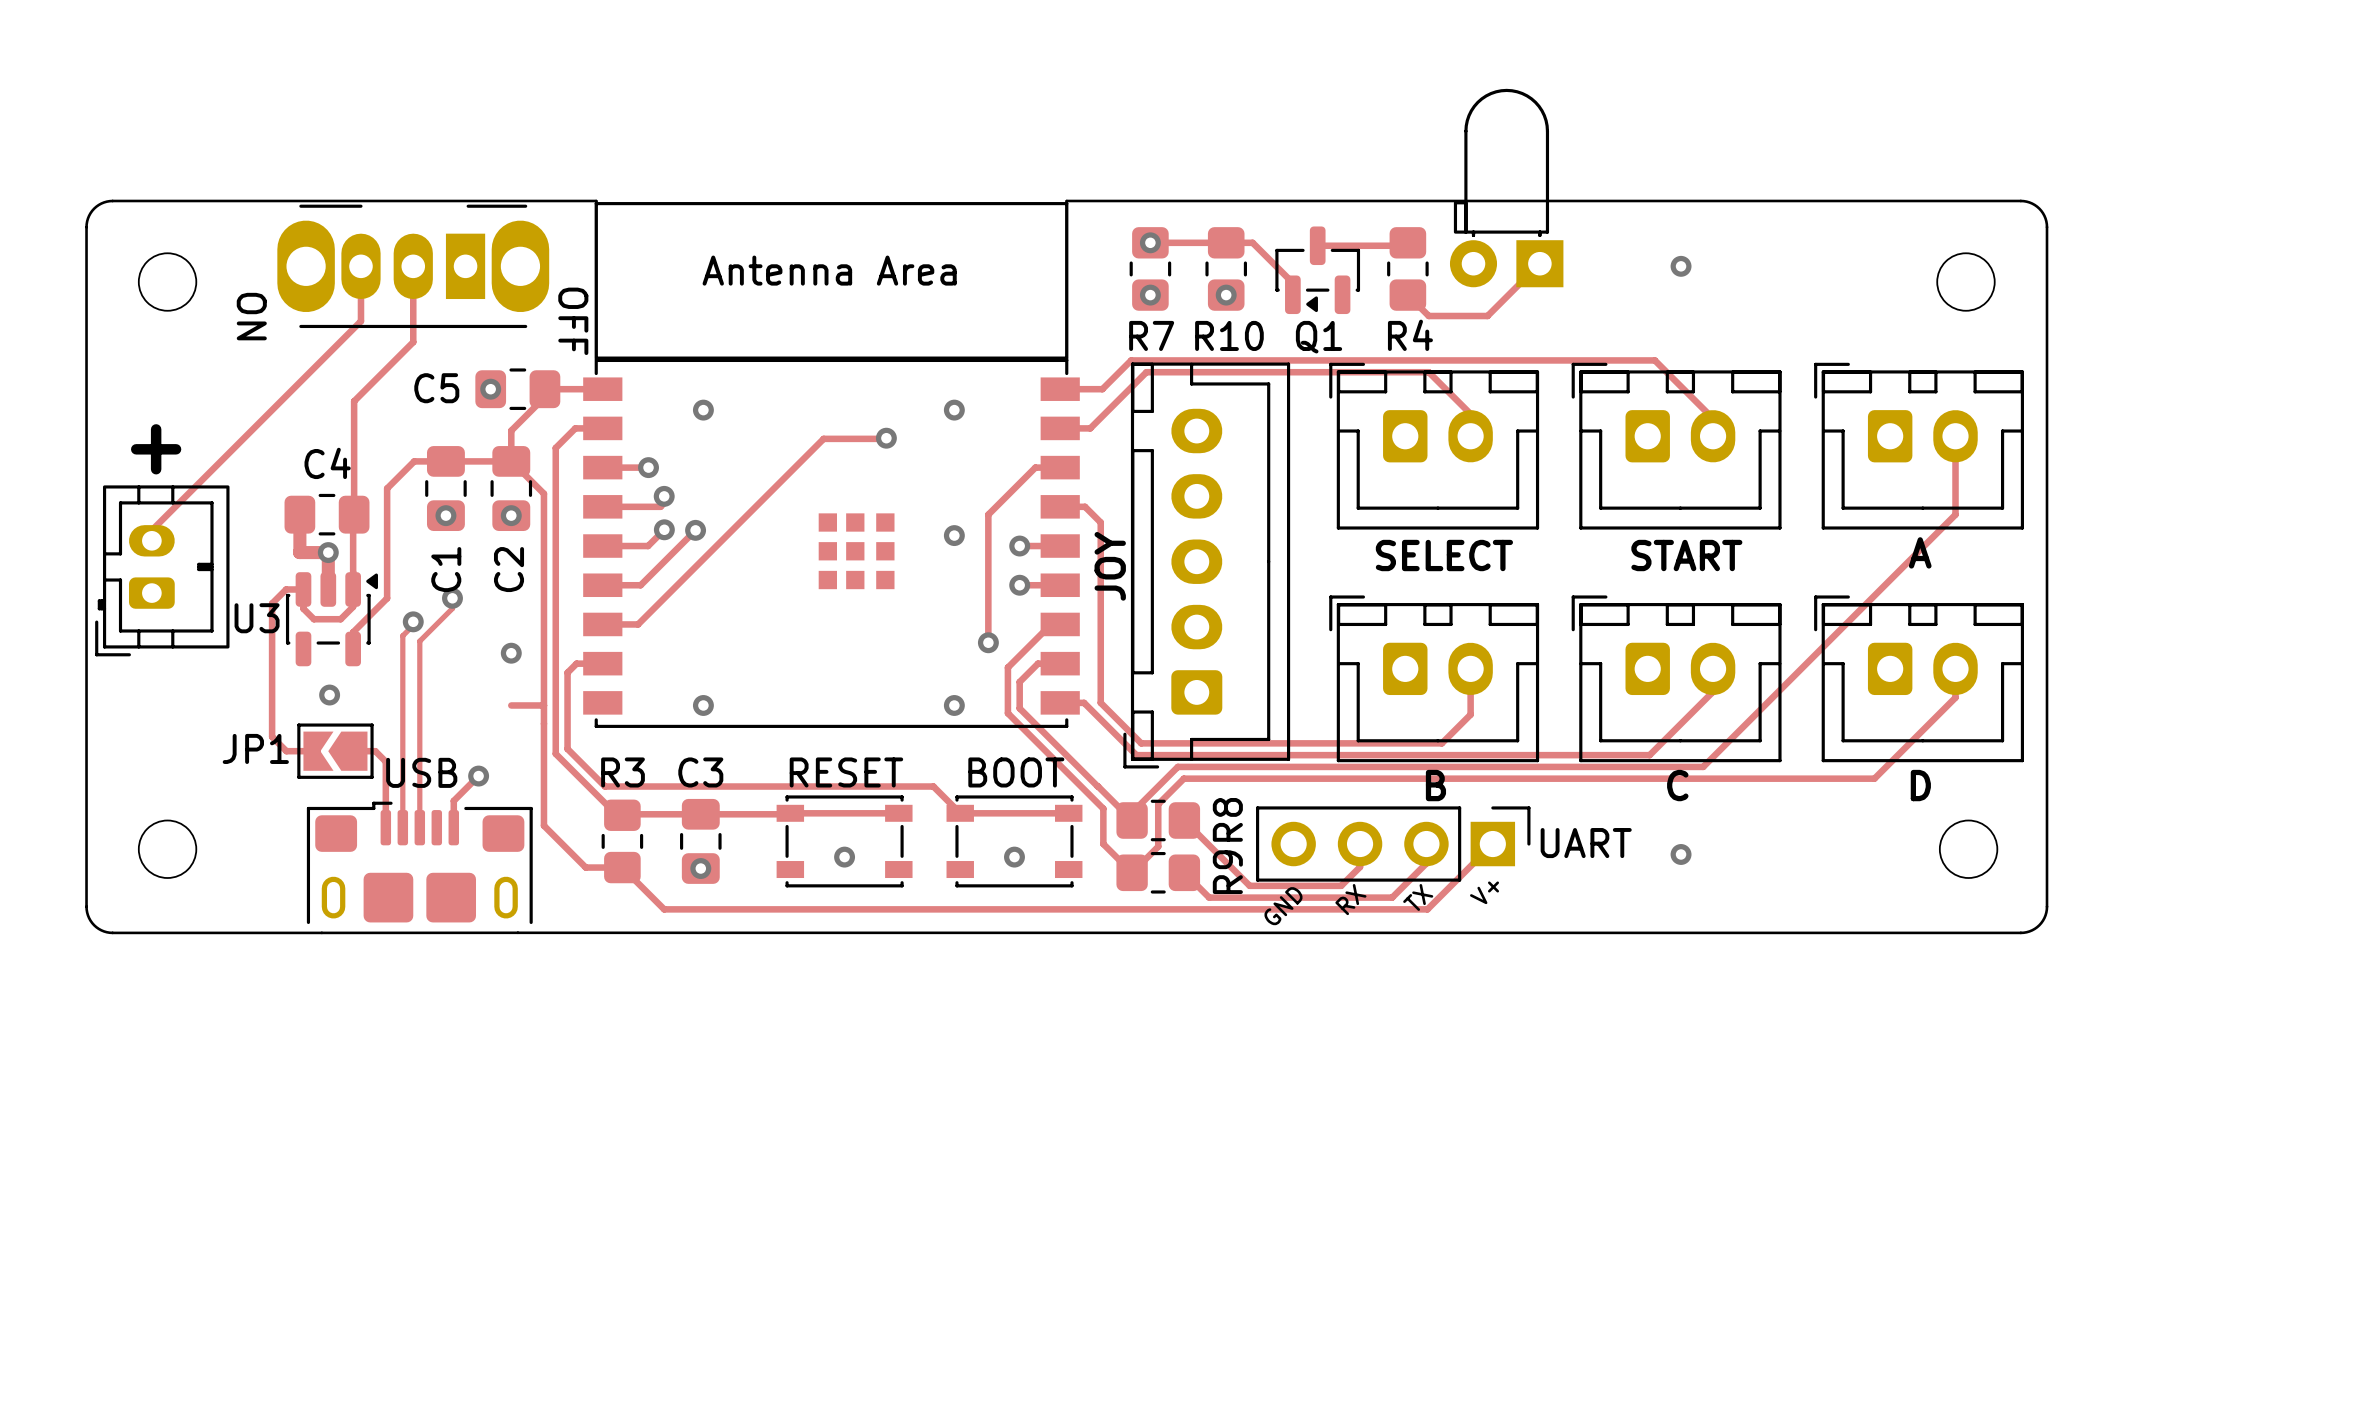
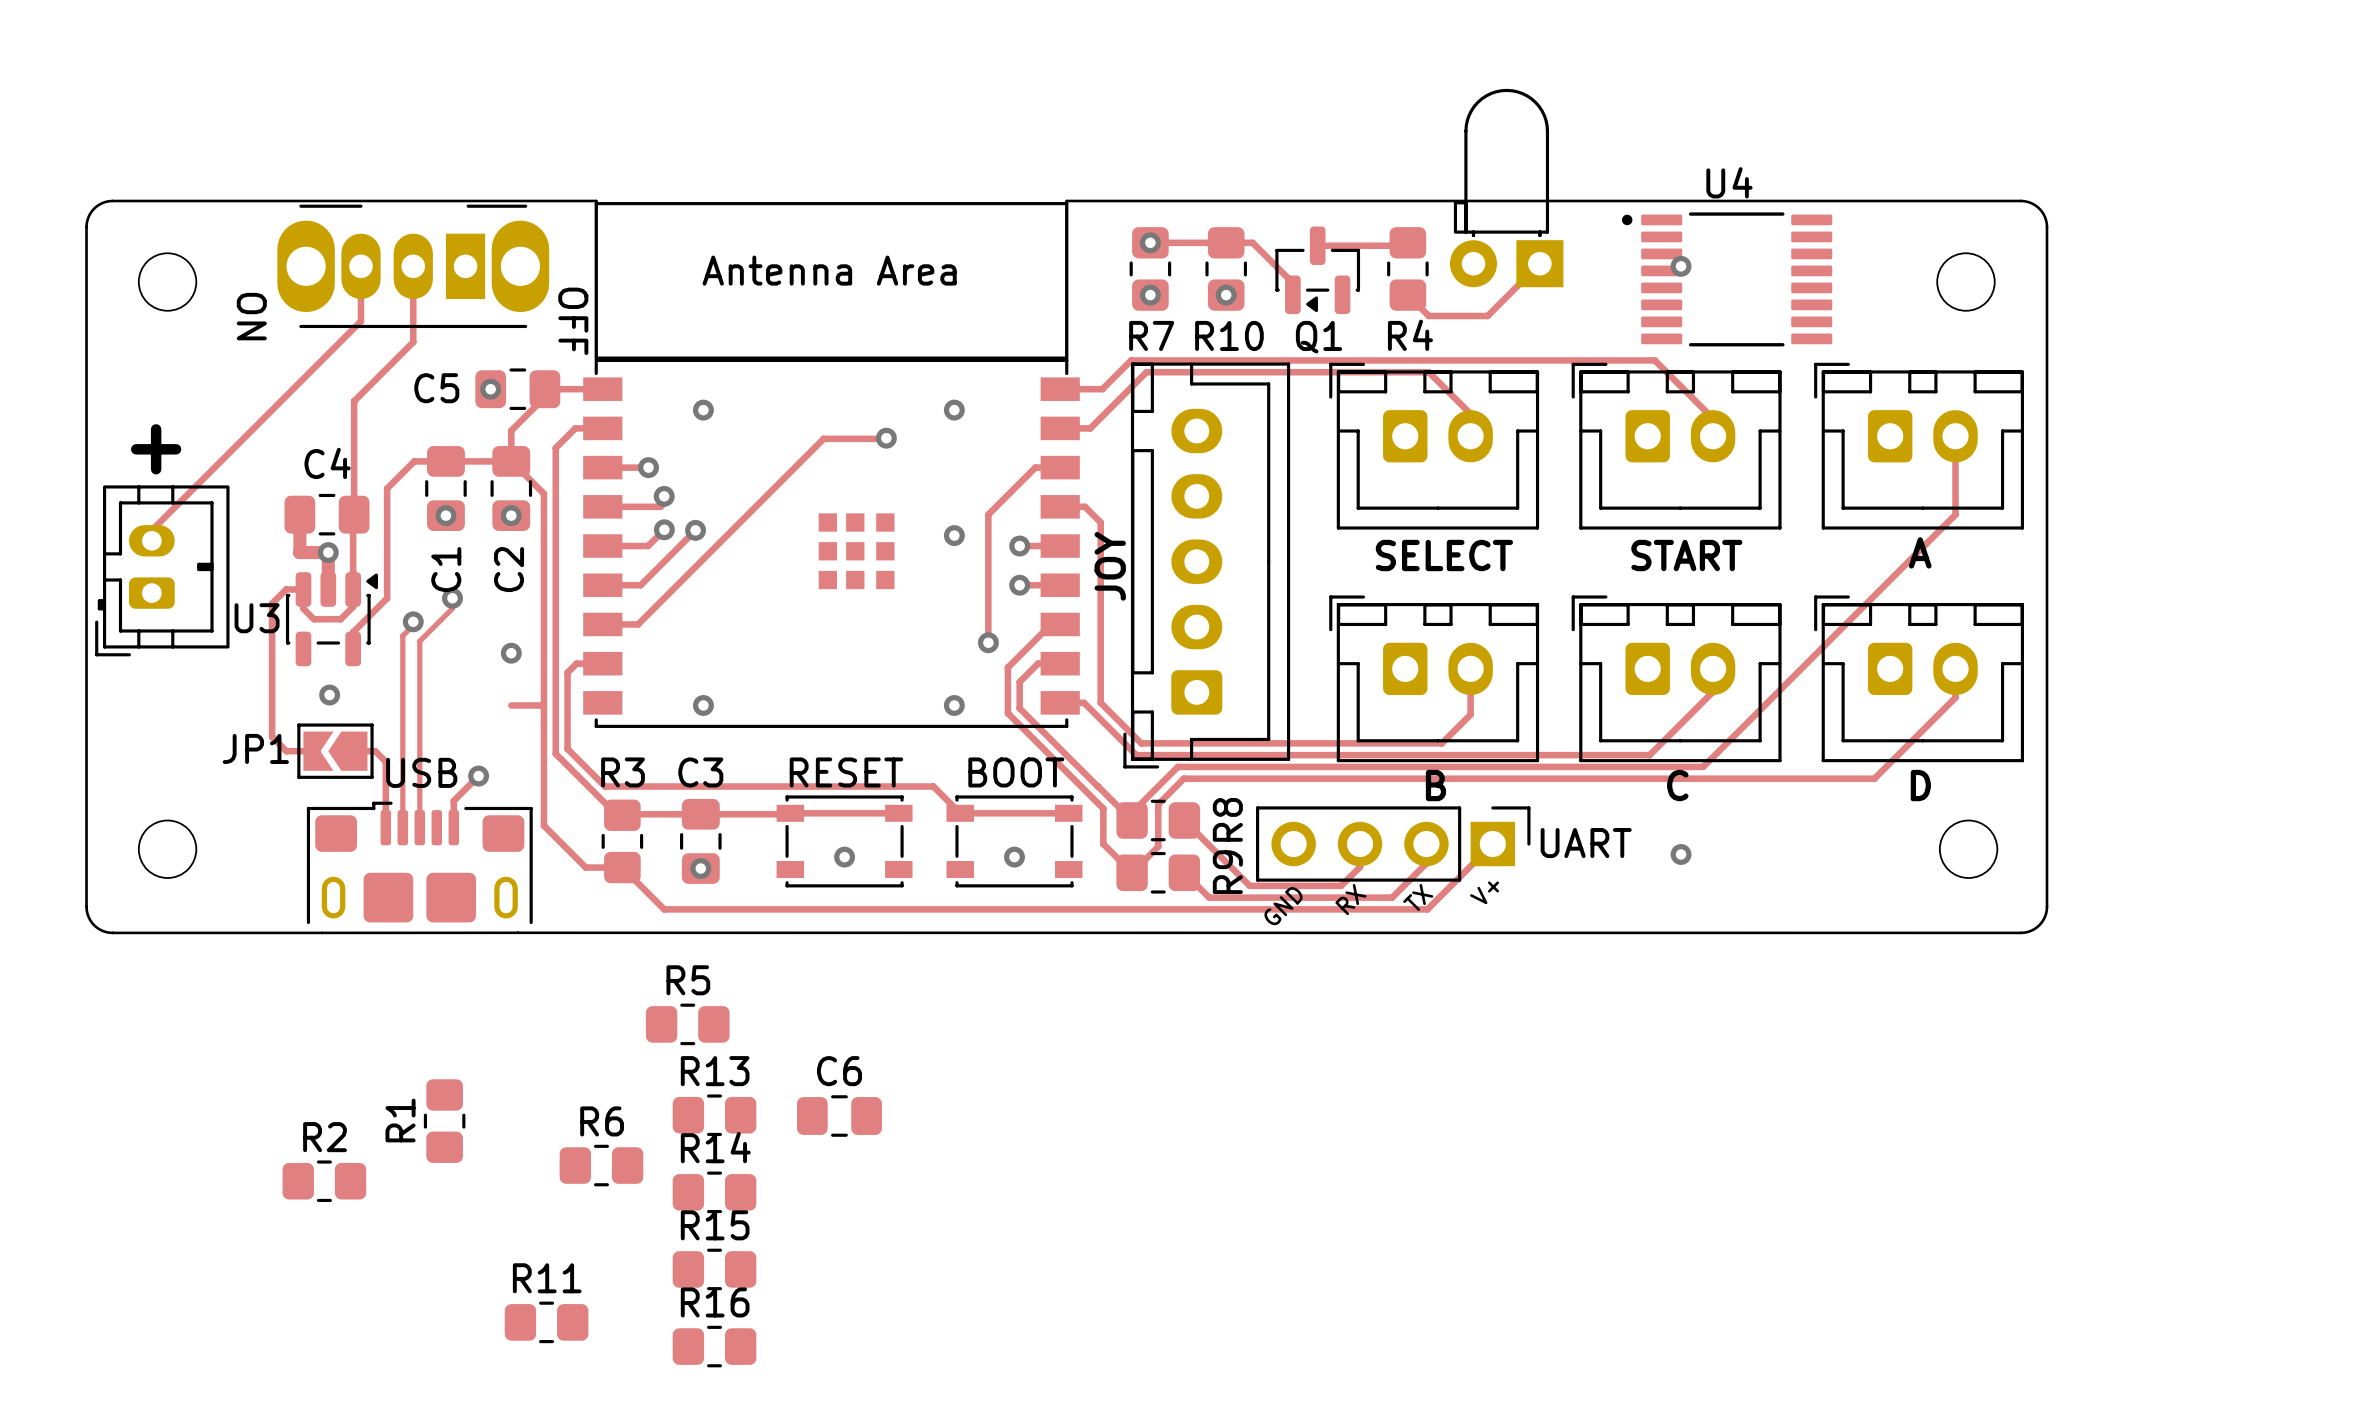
U4: none -> (1727, 279)
R5: none -> (687, 1024)
R13: none -> (714, 1115)
C6: none -> (839, 1116)
R1: none -> (444, 1121)
R6: none -> (601, 1165)
R2: none -> (324, 1181)
R14: none -> (714, 1192)
R15: none -> (714, 1269)
R11: none -> (546, 1322)
R16: none -> (714, 1346)

